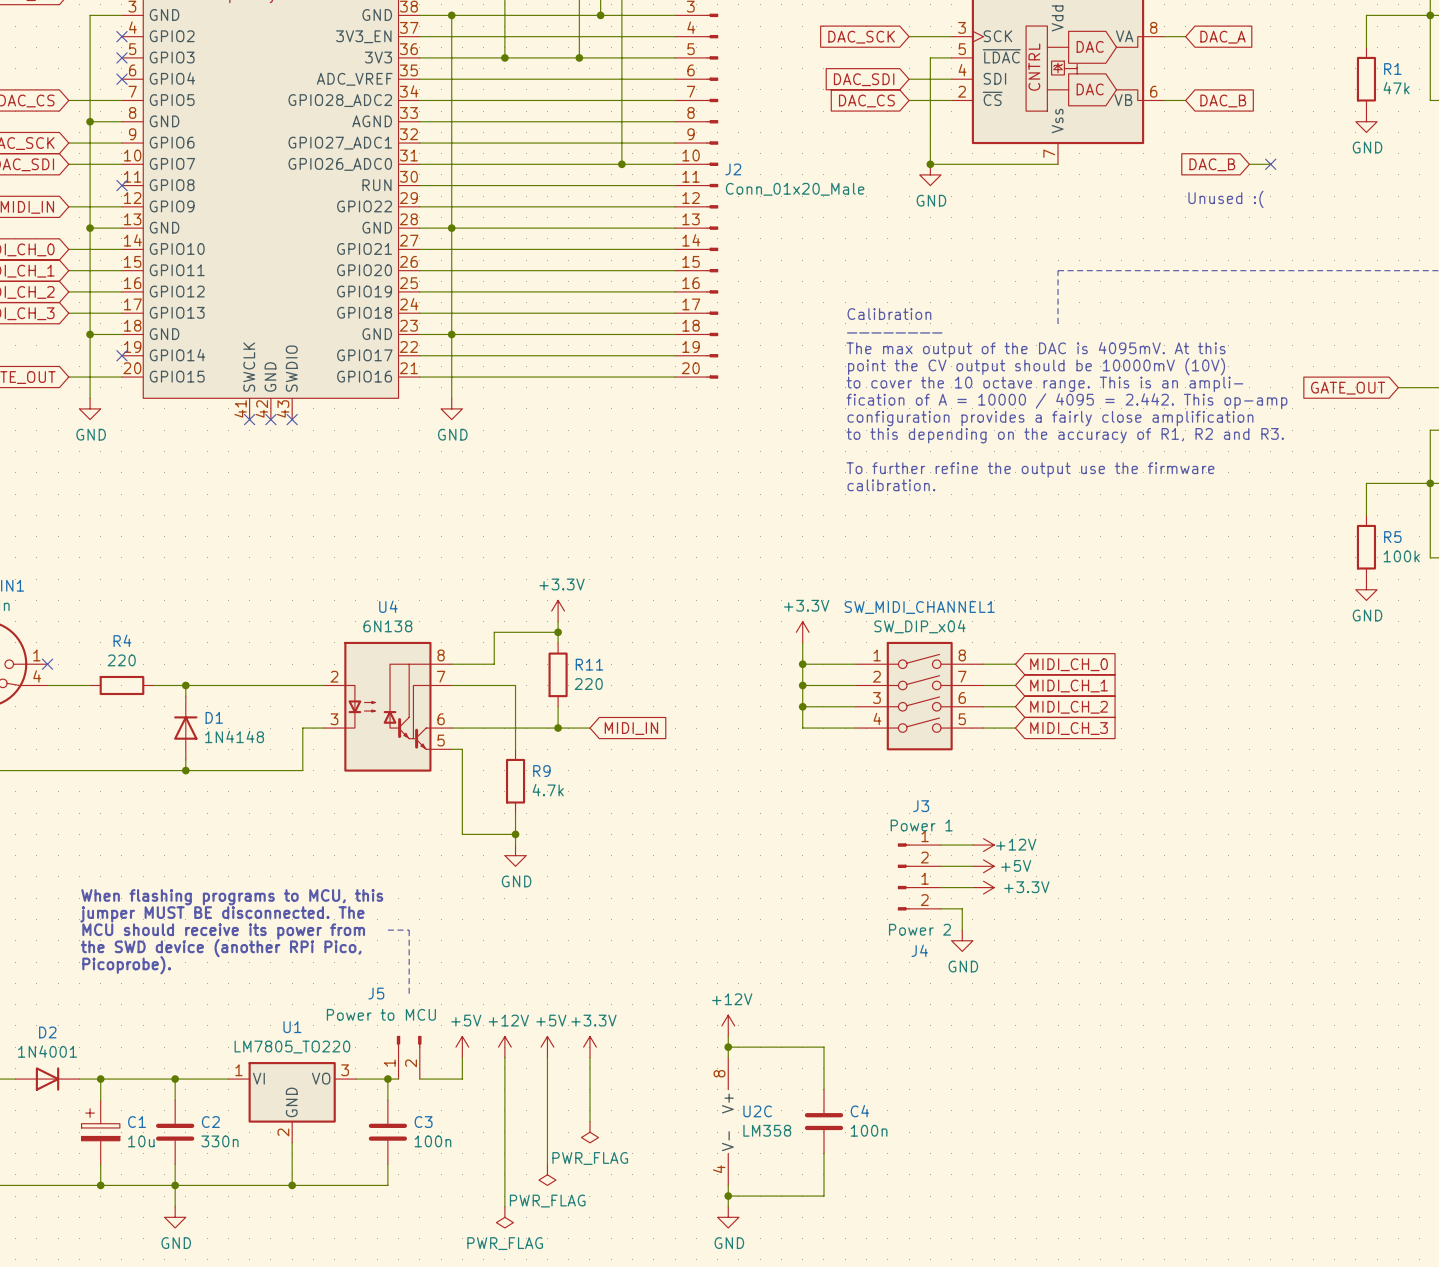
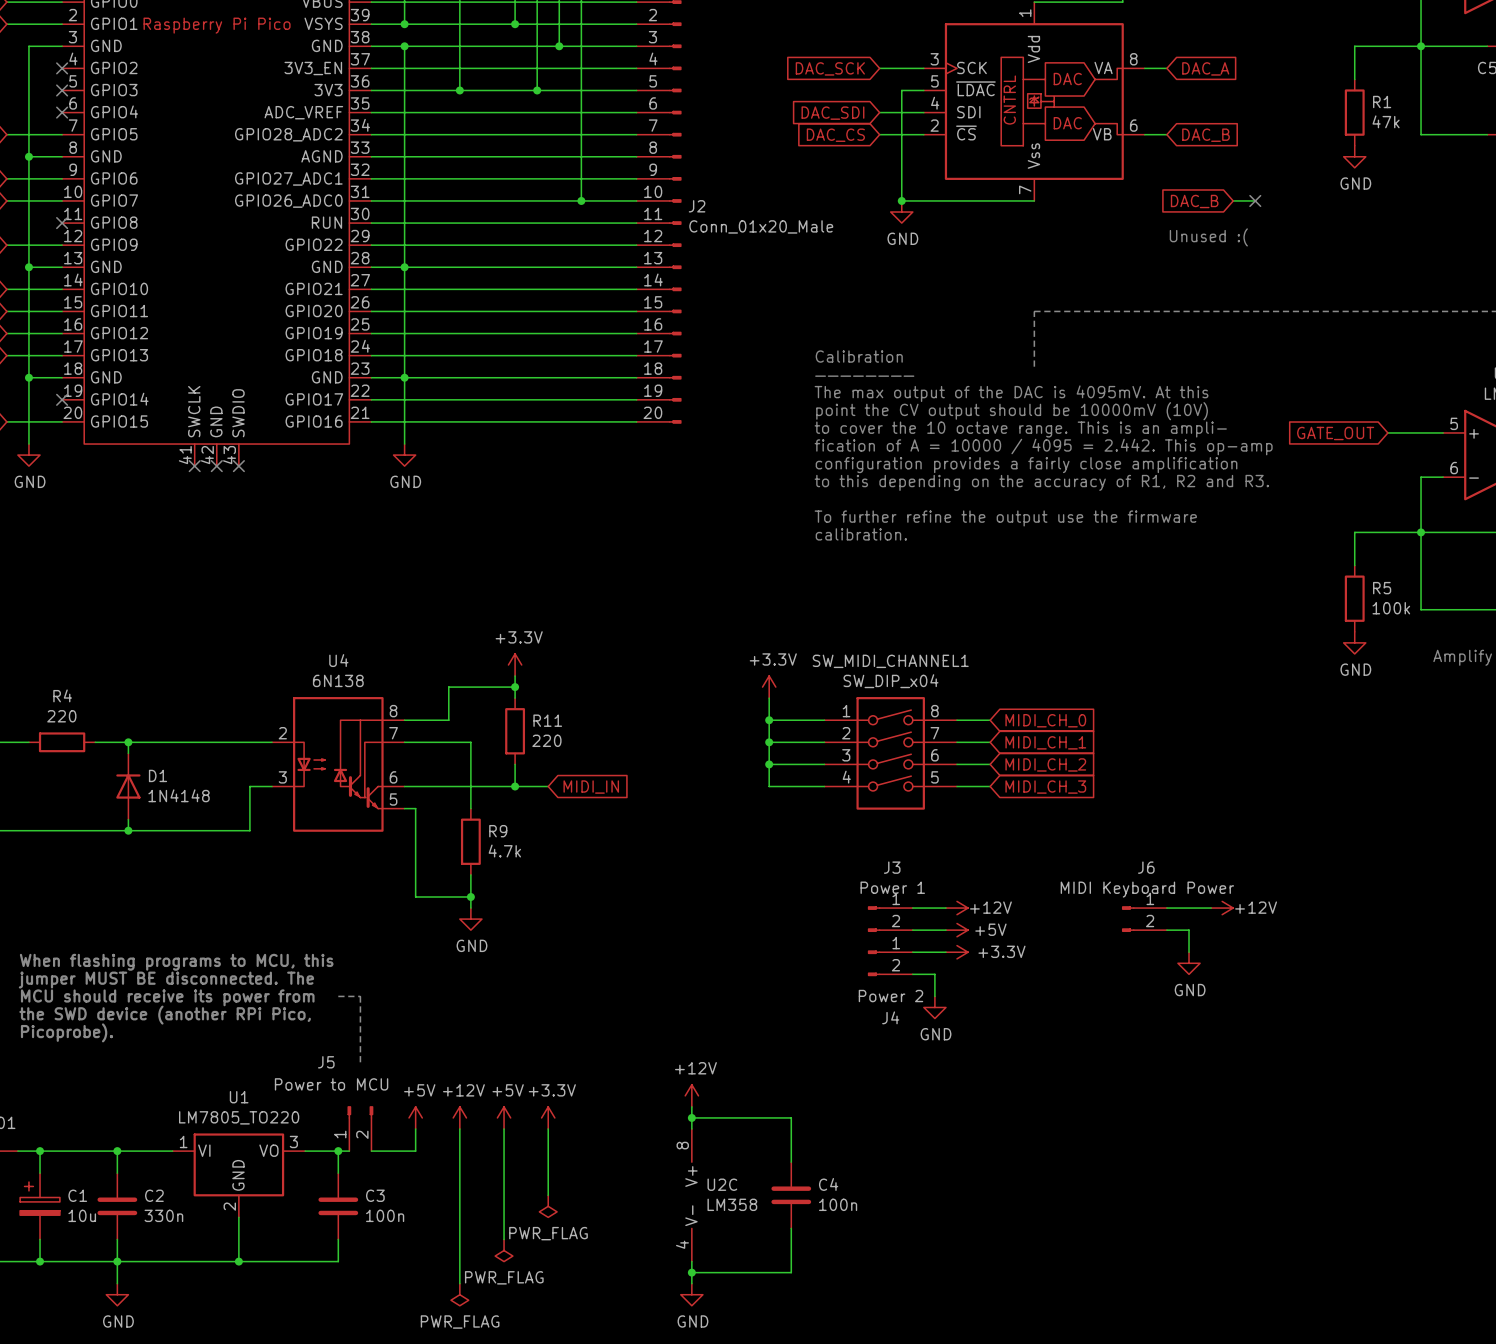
wire: none -> (1166, 908) (1211, 908)
power symbol: none -> +12V (1222, 908)
J6: none -> MIDI Keyboard Power (1144, 919)
wire: none -> (1166, 930) (1189, 930) (1189, 952)
power symbol: none -> GND (1189, 963)

